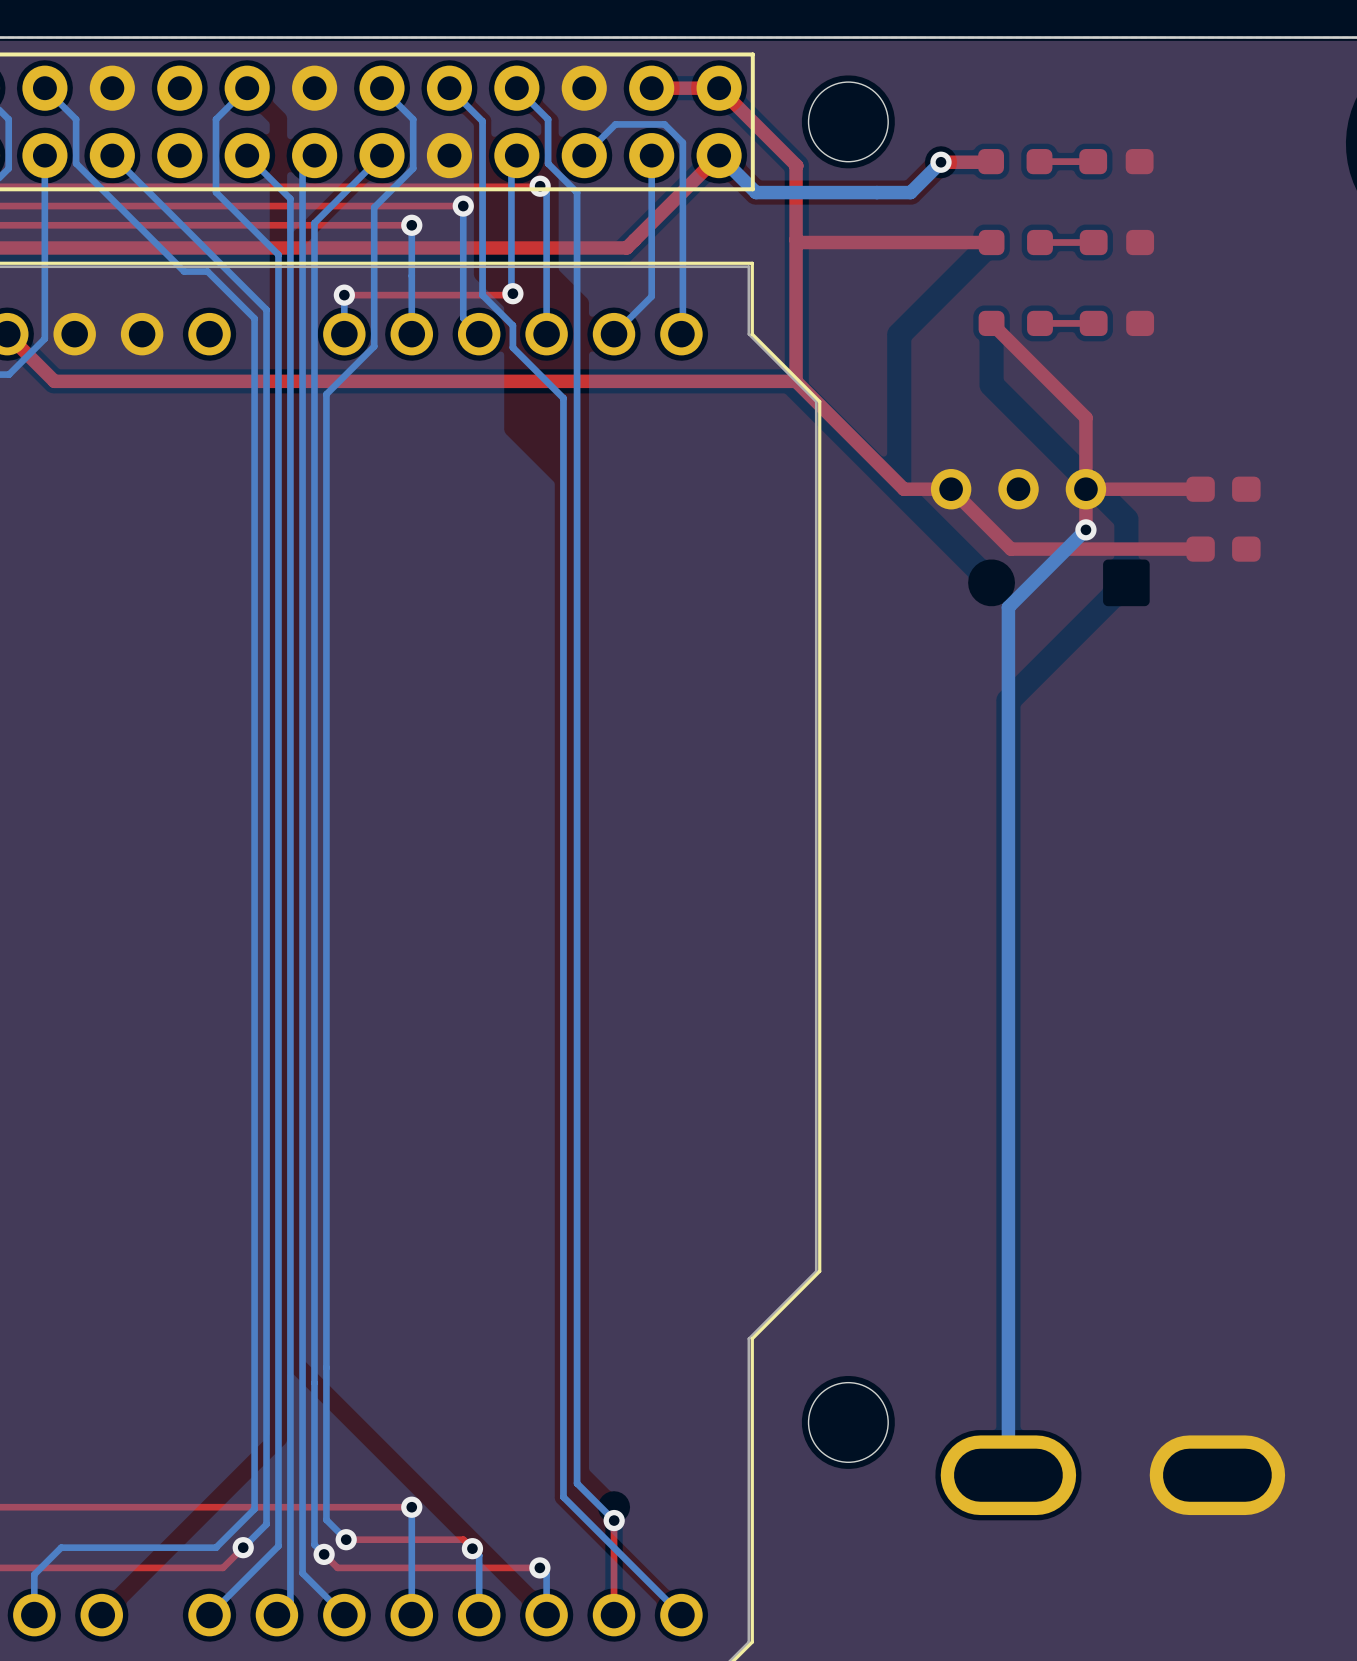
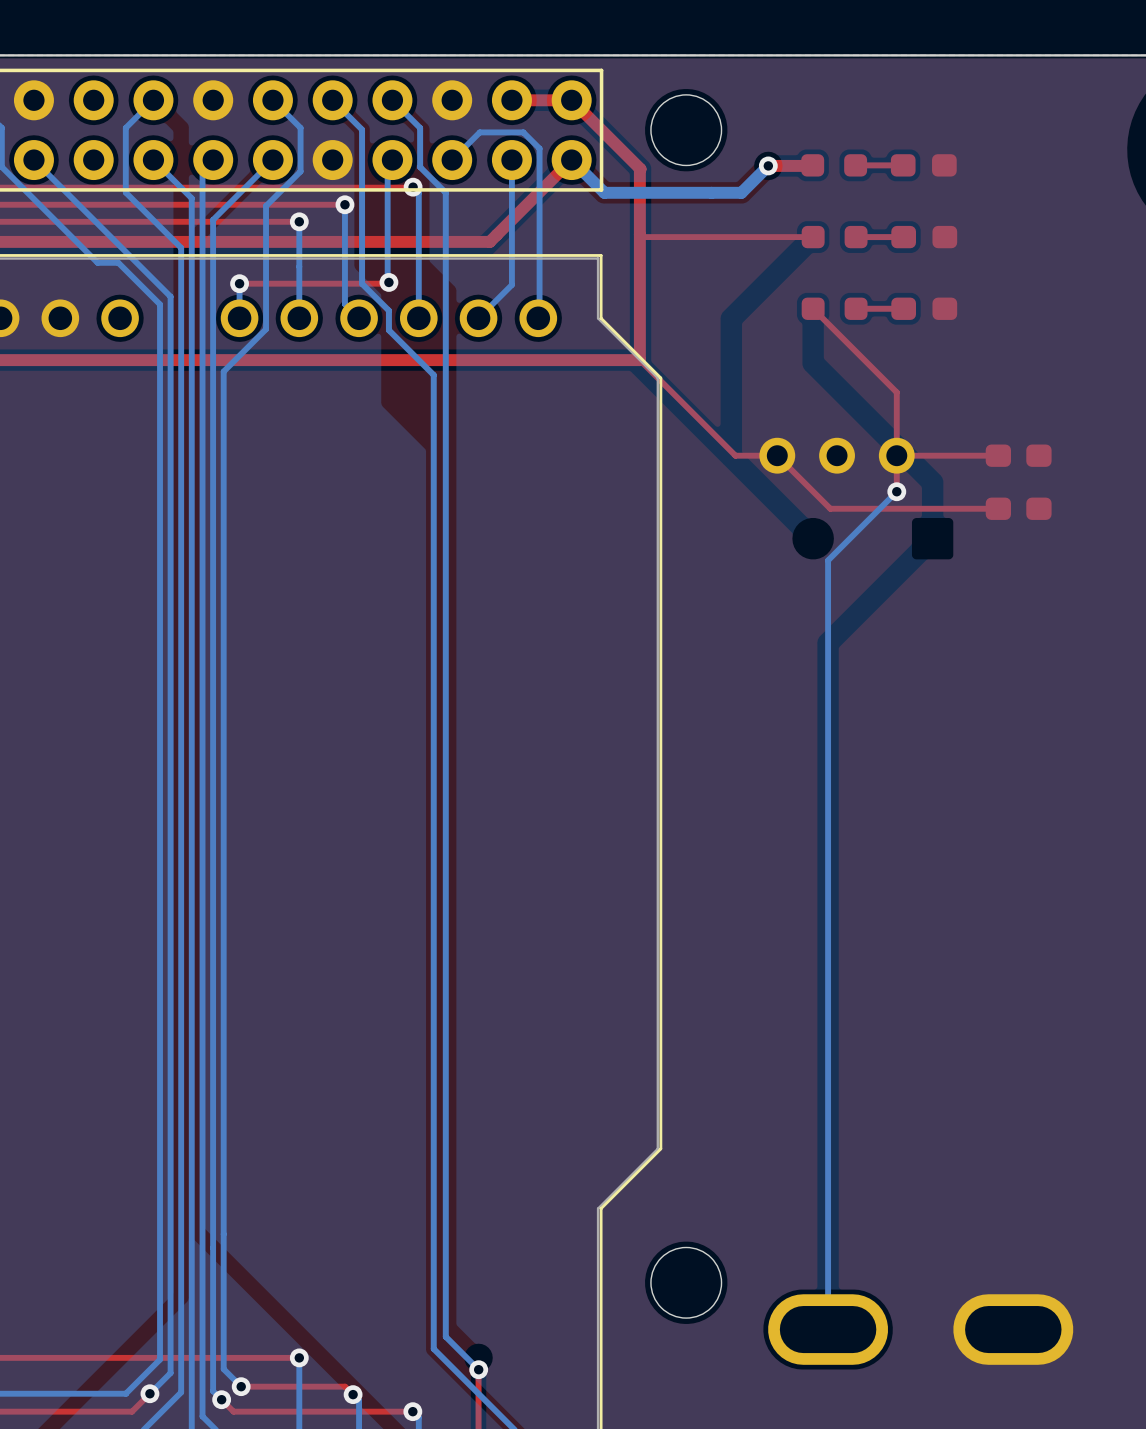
top track width: thick (991, 242) (798, 242) -> thin (813, 237) (642, 237)
top track width: thick (991, 323) (1085, 417) (1085, 529) -> thin (813, 308) (896, 392) (896, 491)
top track width: thick (796, 381) (903, 489) (951, 489) (1010, 549) (1200, 549) -> thin (639, 360) (735, 455) (777, 455) (830, 508) (998, 508)
top track width: thick (1200, 489) (1085, 489) -> thin (998, 455) (896, 455)
bottom track width: thick (1085, 529) (1008, 607) (1008, 1475) -> thin (896, 491) (828, 560) (828, 1329)

